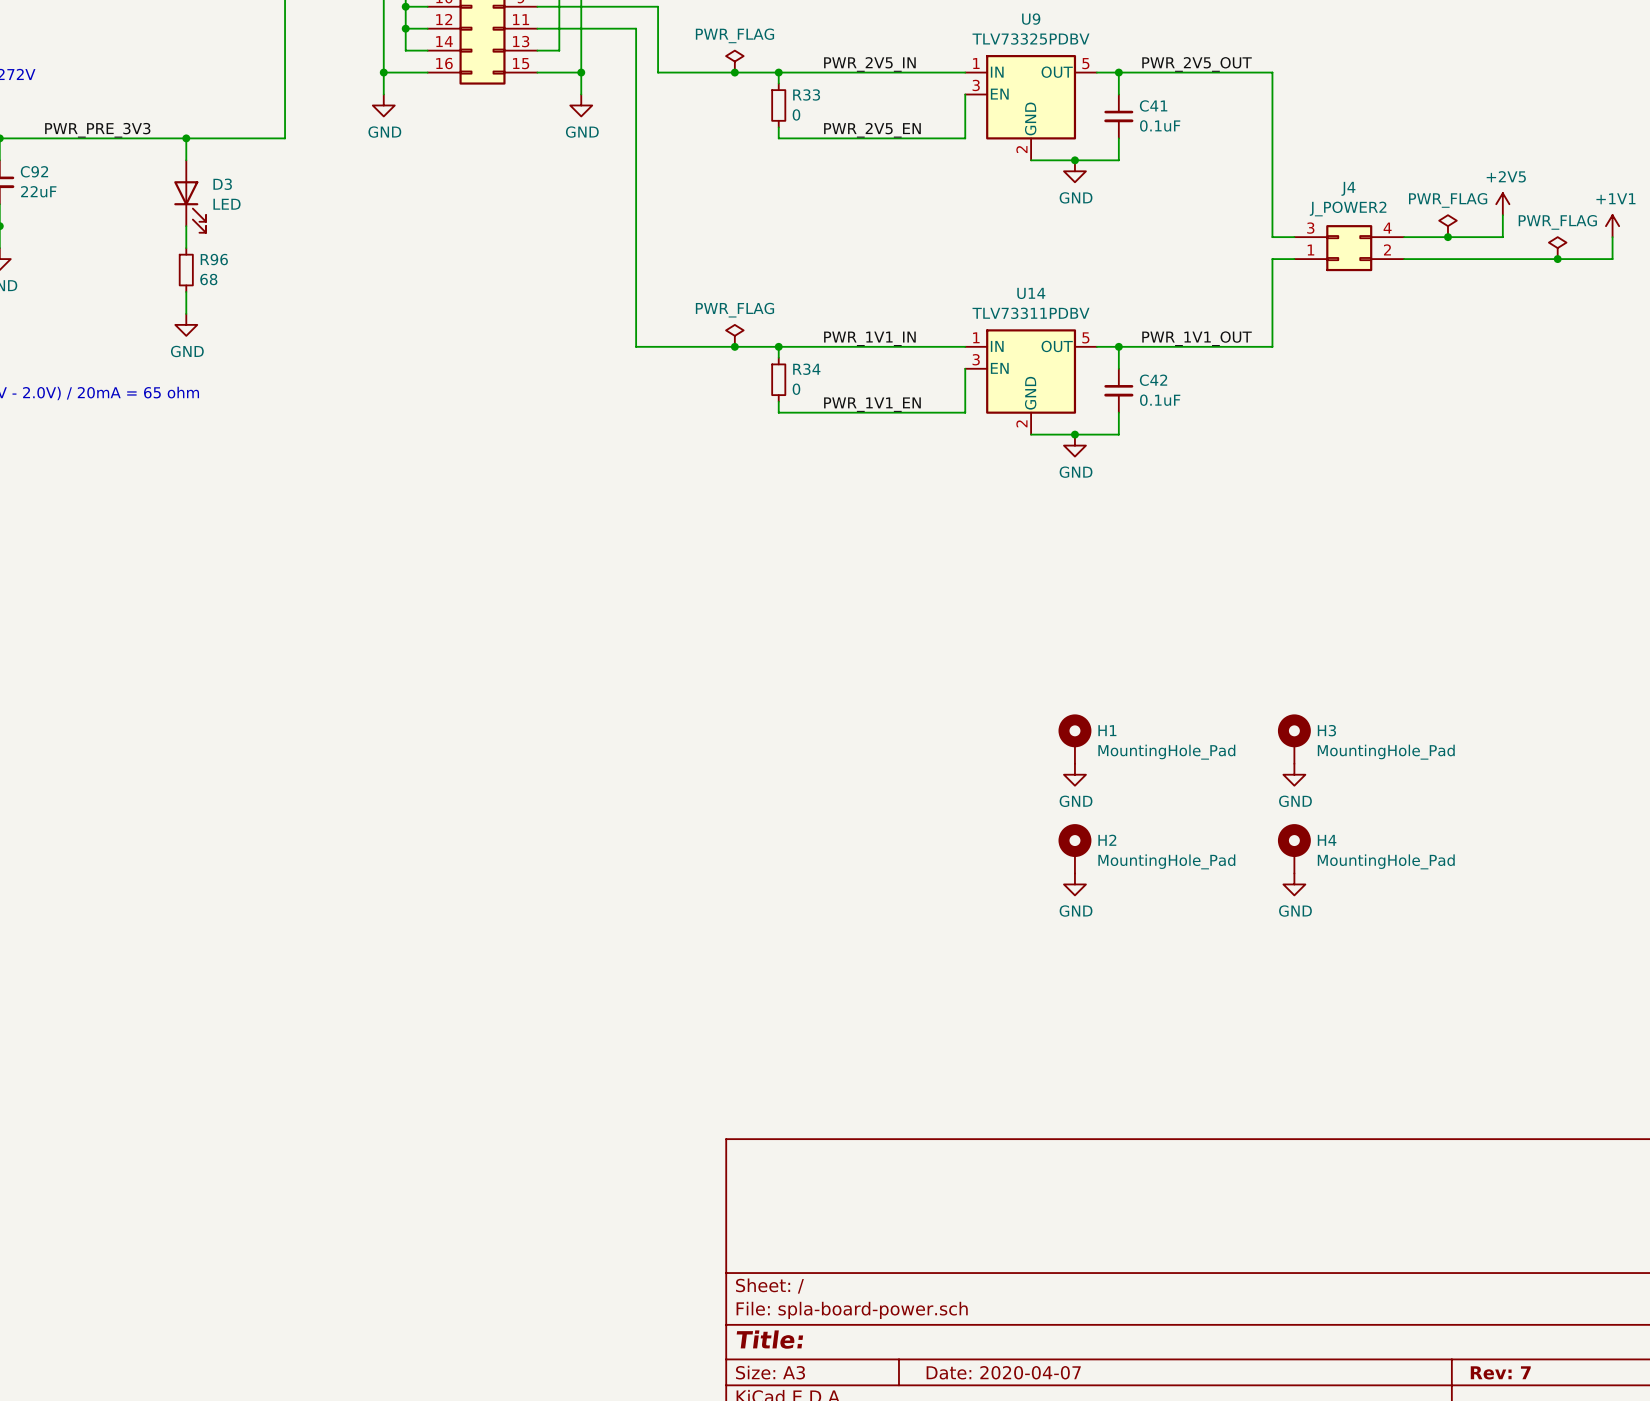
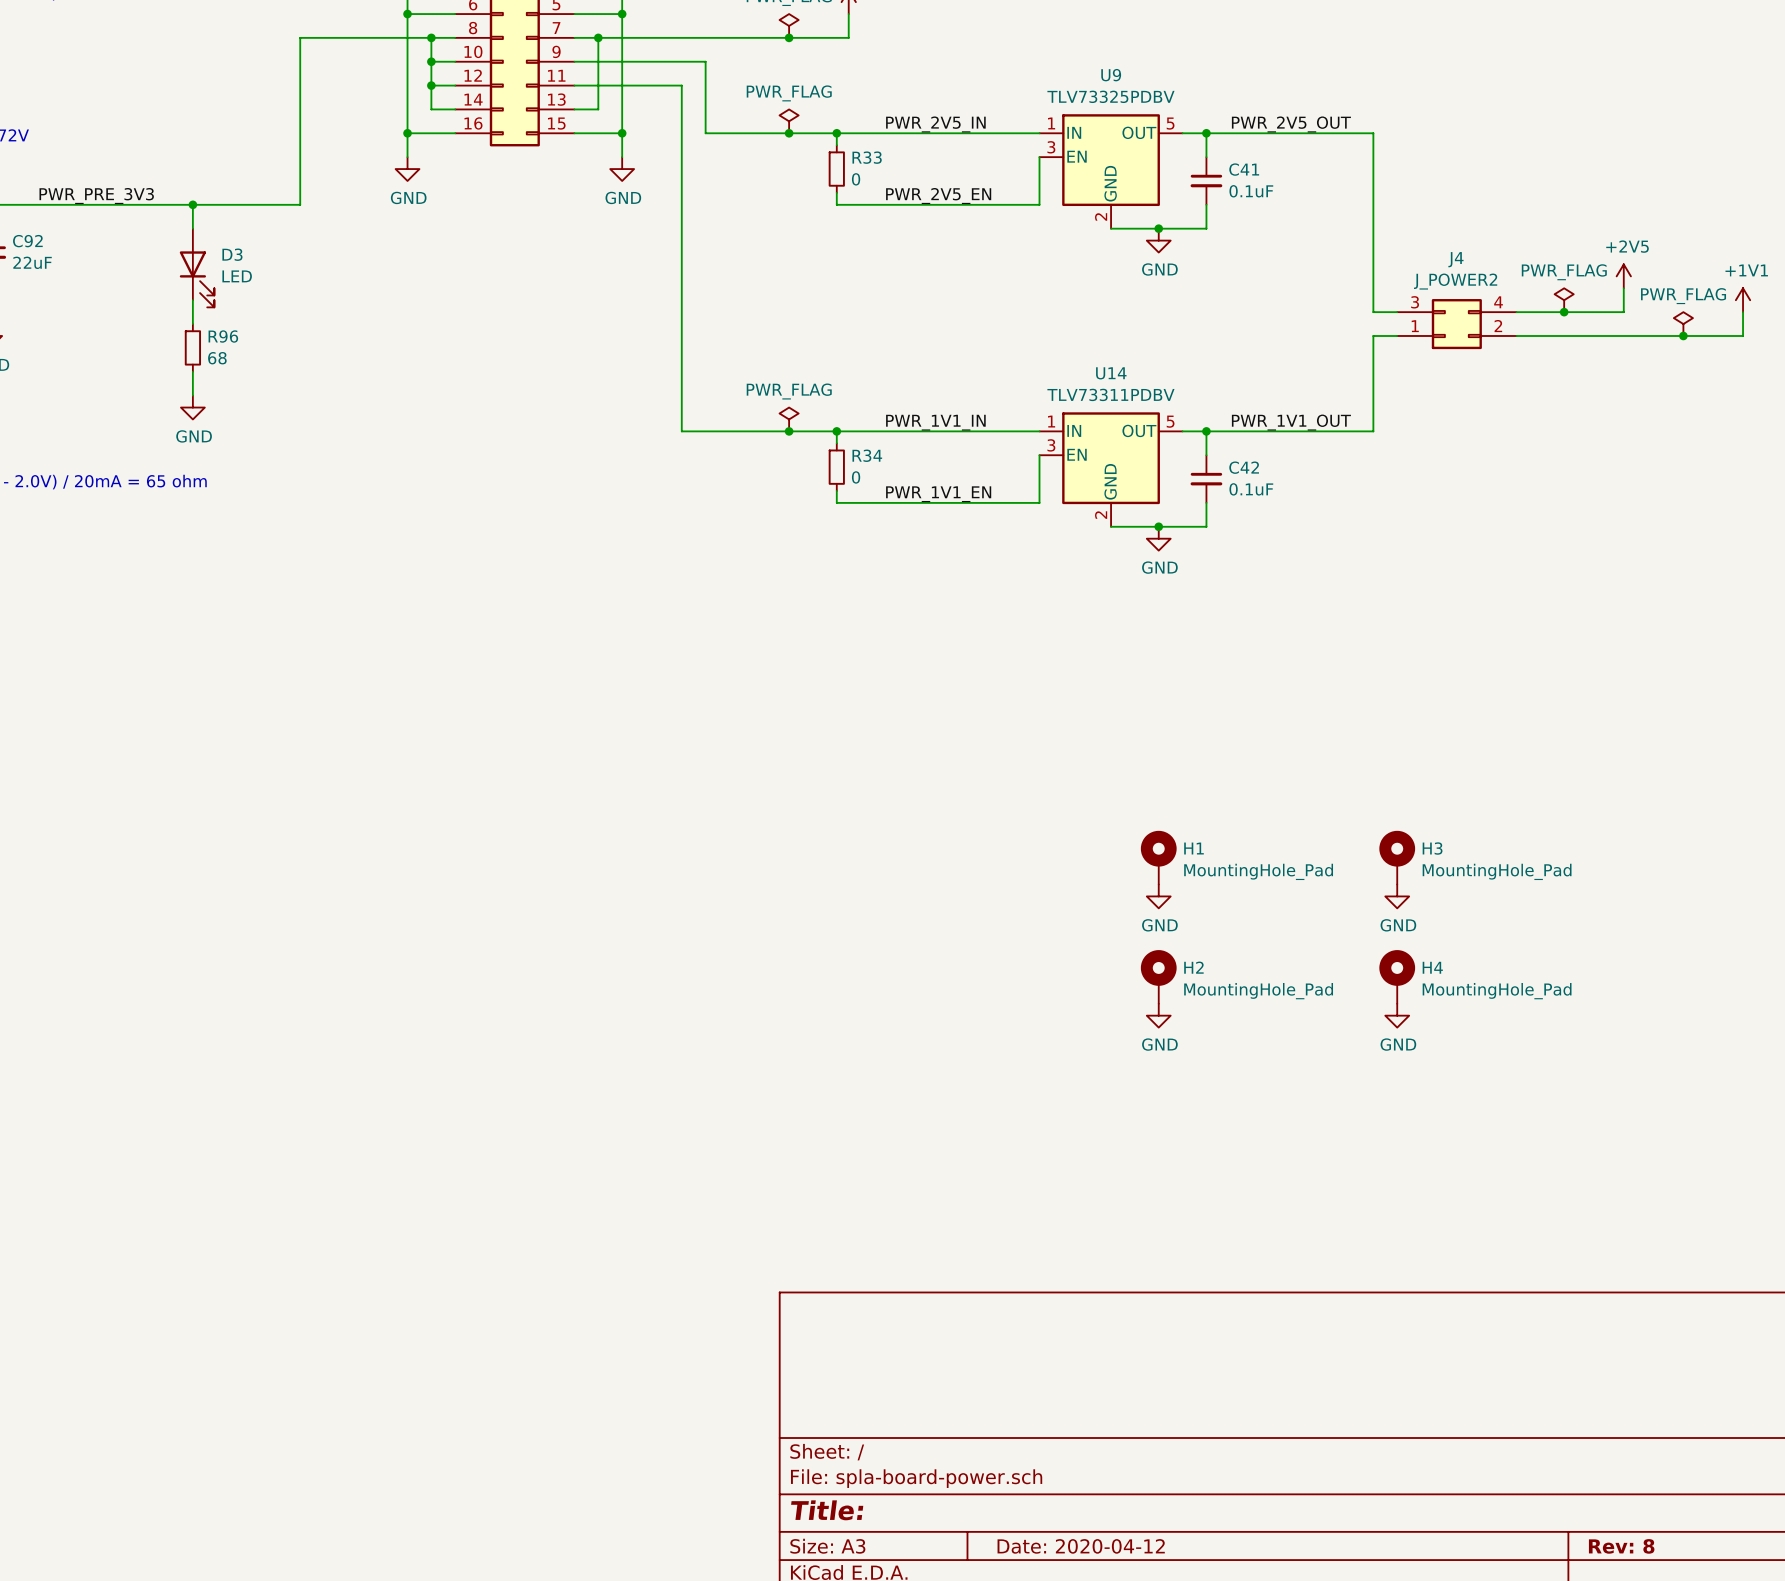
title block: Date: 2020-04-07 (1003, 1372) -> Date: 2020-04-12 (1081, 1546)
title block: Rev: 7 (1500, 1372) -> Rev: 8 (1621, 1546)

